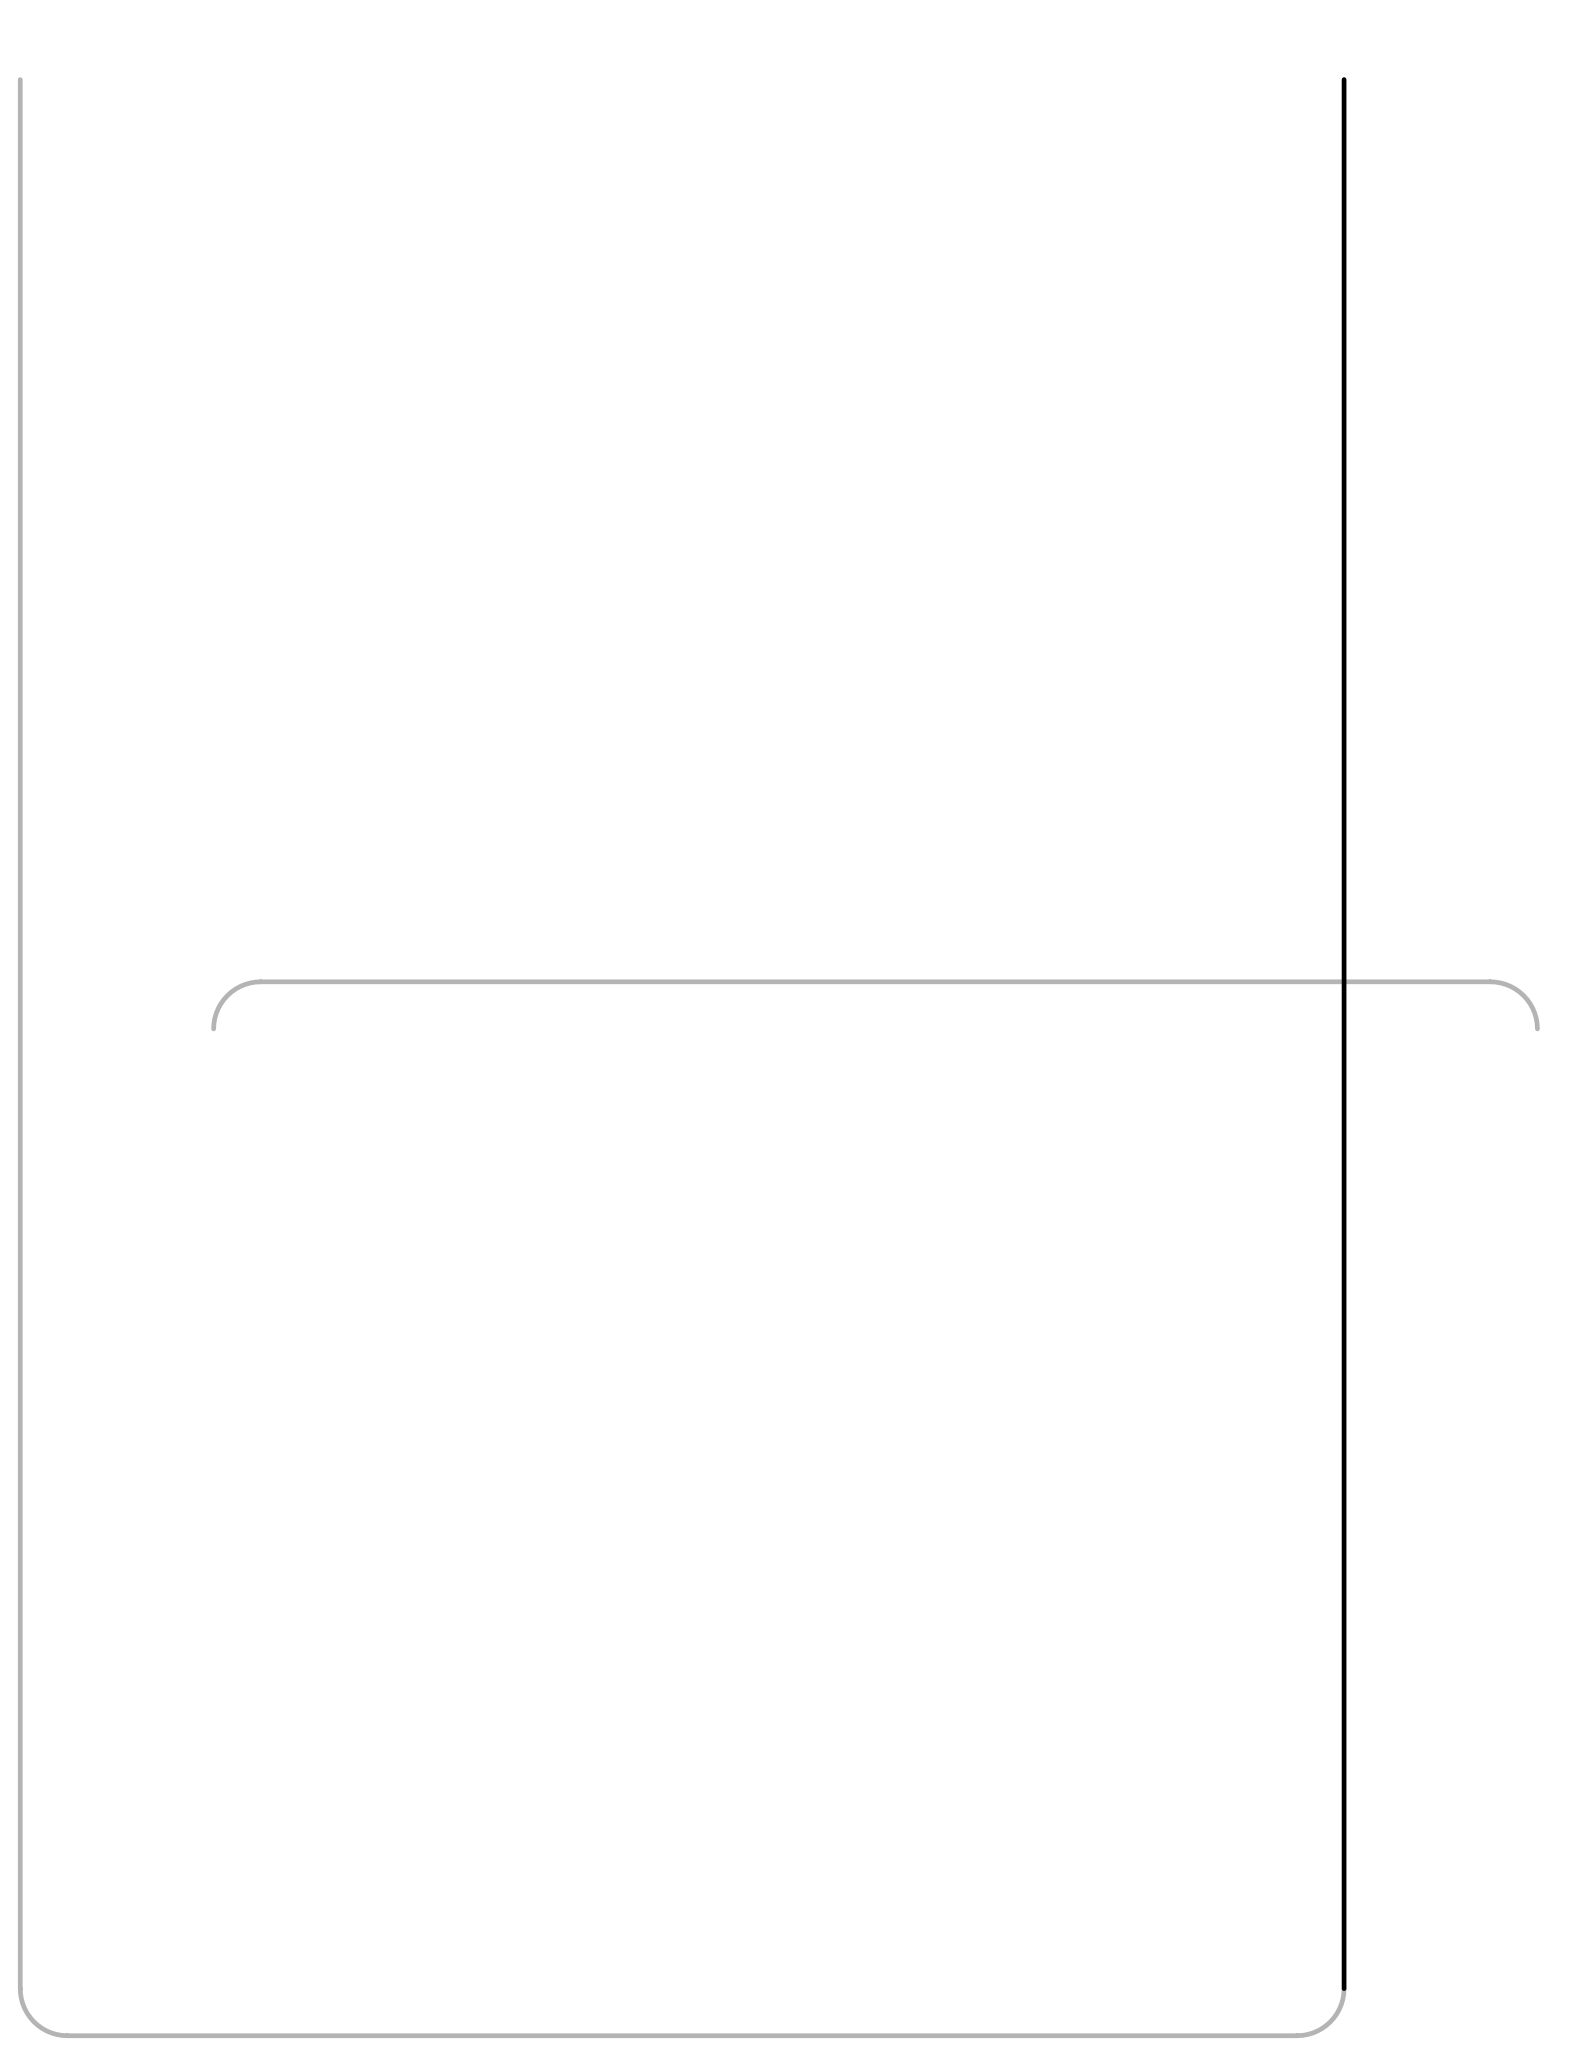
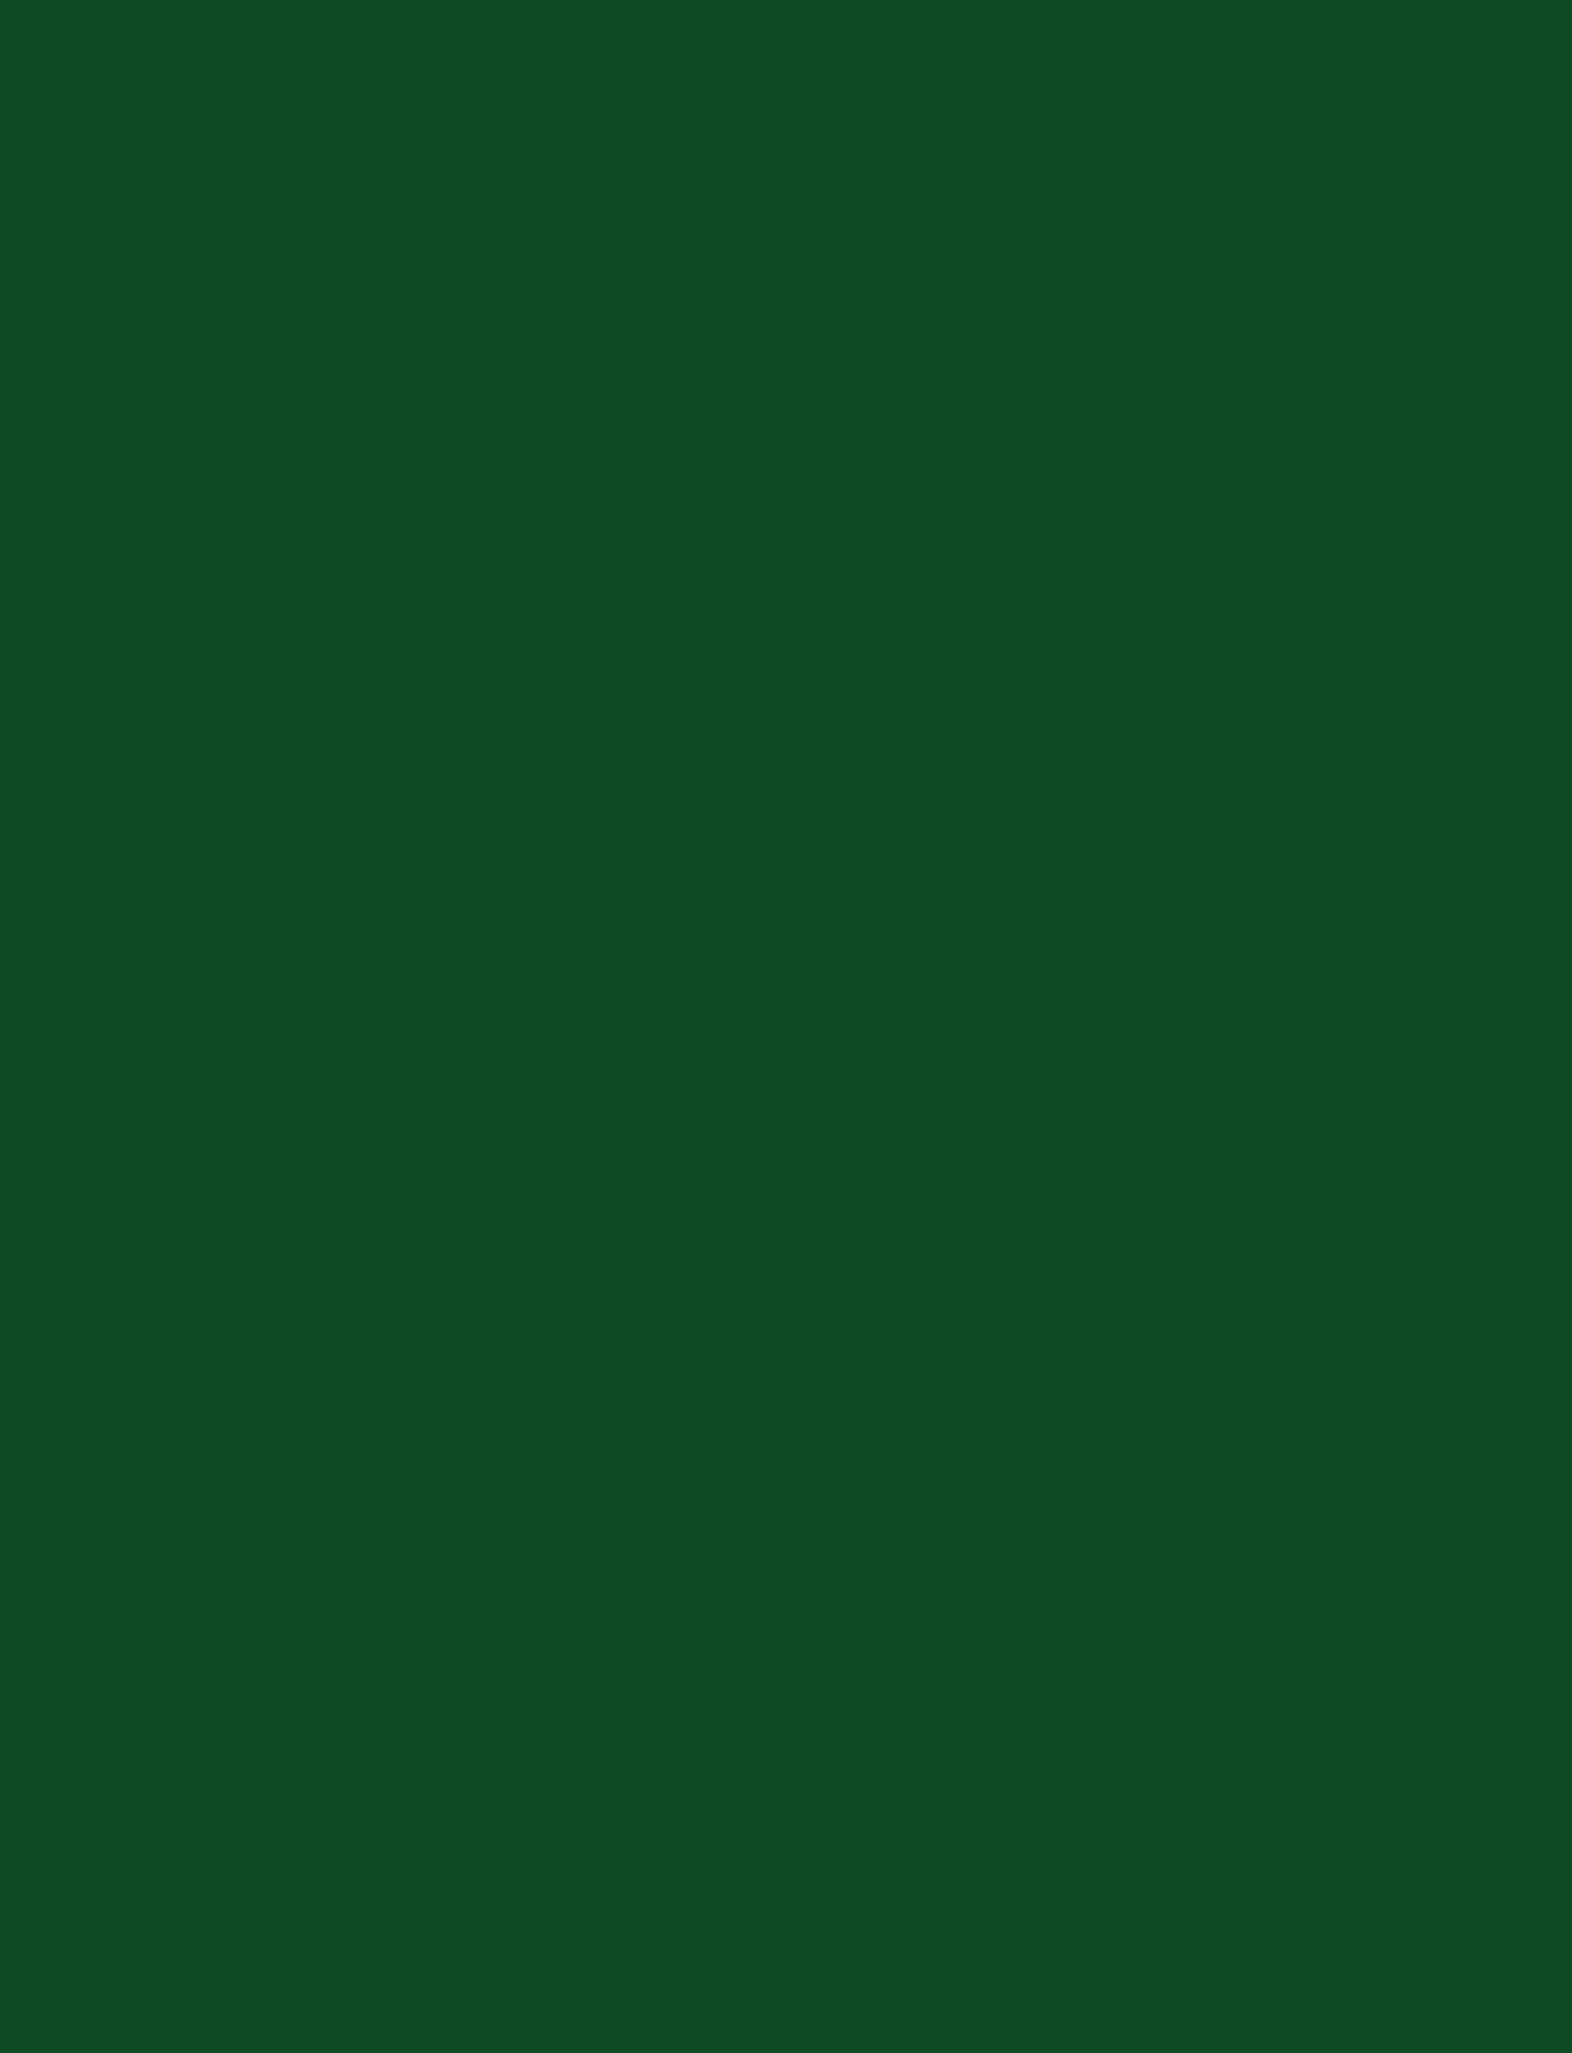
track: (20, 79) (20, 1988) (22, 2004) (27, 2013) (42, 2028) (51, 2033) (67, 2035) (1296, 2035) (1317, 2031) (1330, 2021) (1339, 2009) (1344, 1988) -> none
board edge: (1344, 79) (1344, 1988) -> none
track: (213, 1028) (216, 1013) (227, 995) (240, 986) (260, 981) (1490, 981) (1510, 986) (1523, 995) (1532, 1008) (1537, 1028) -> none

